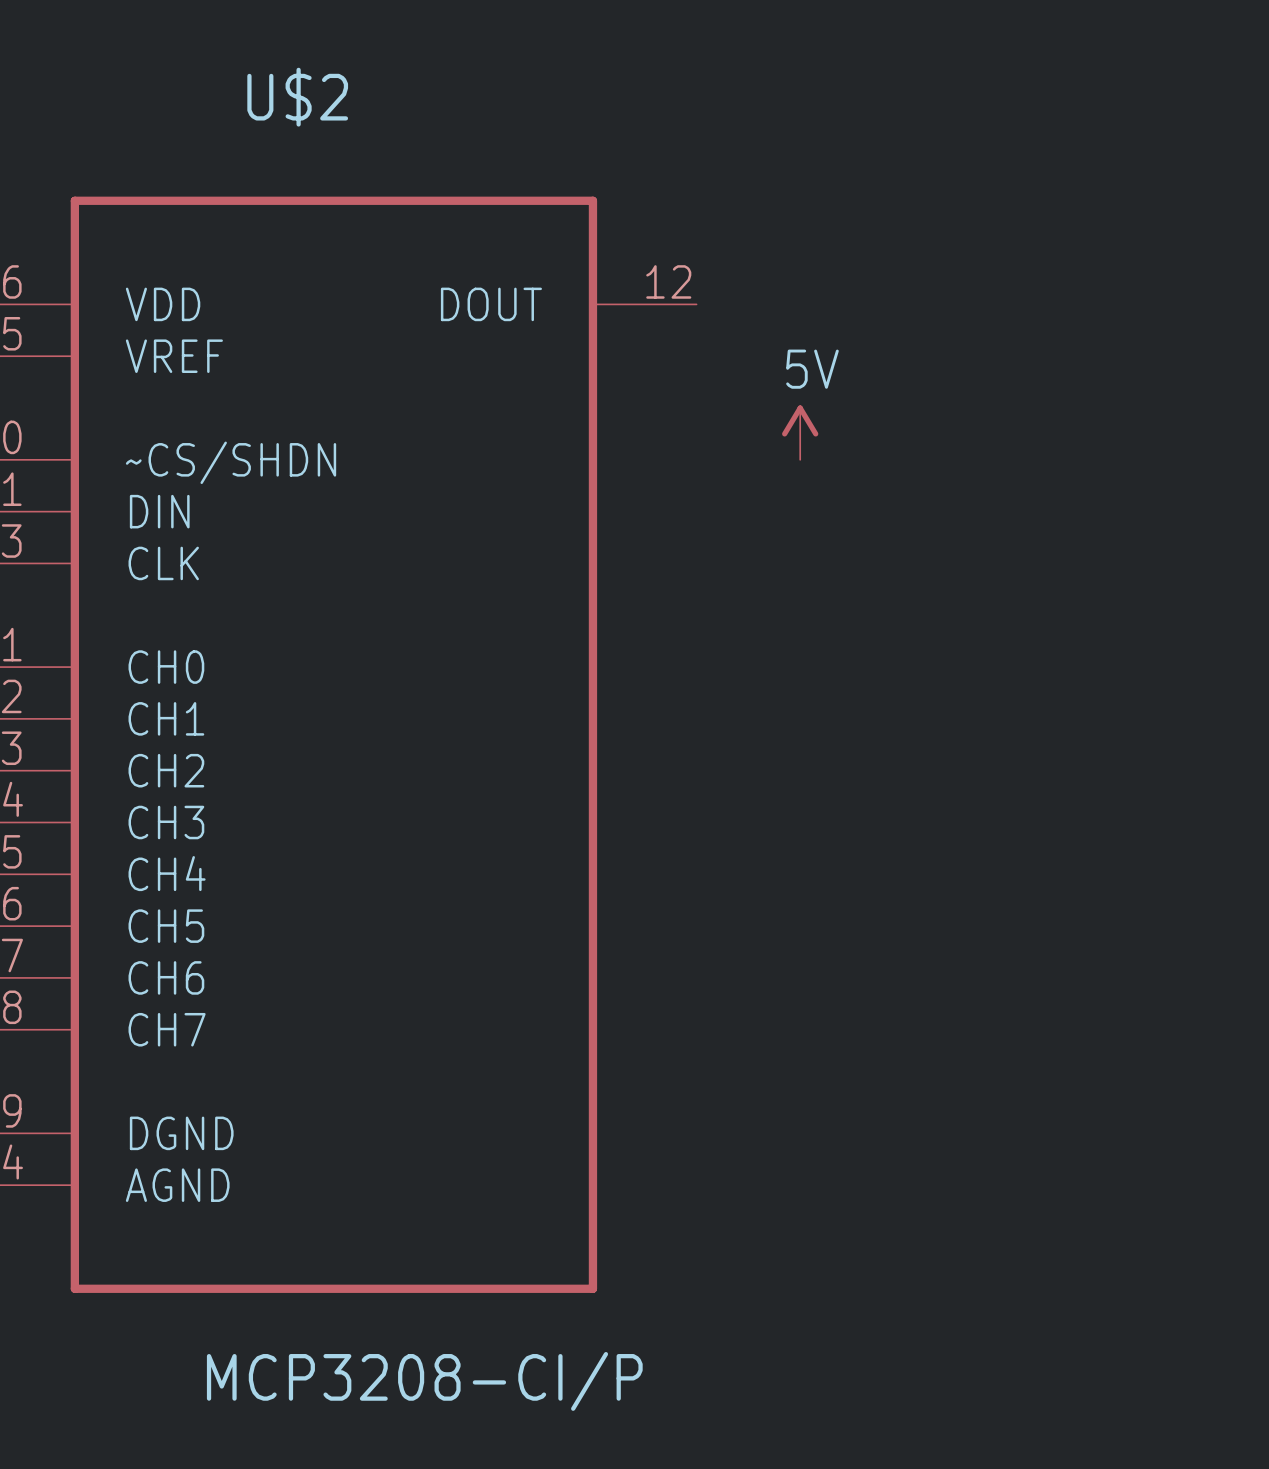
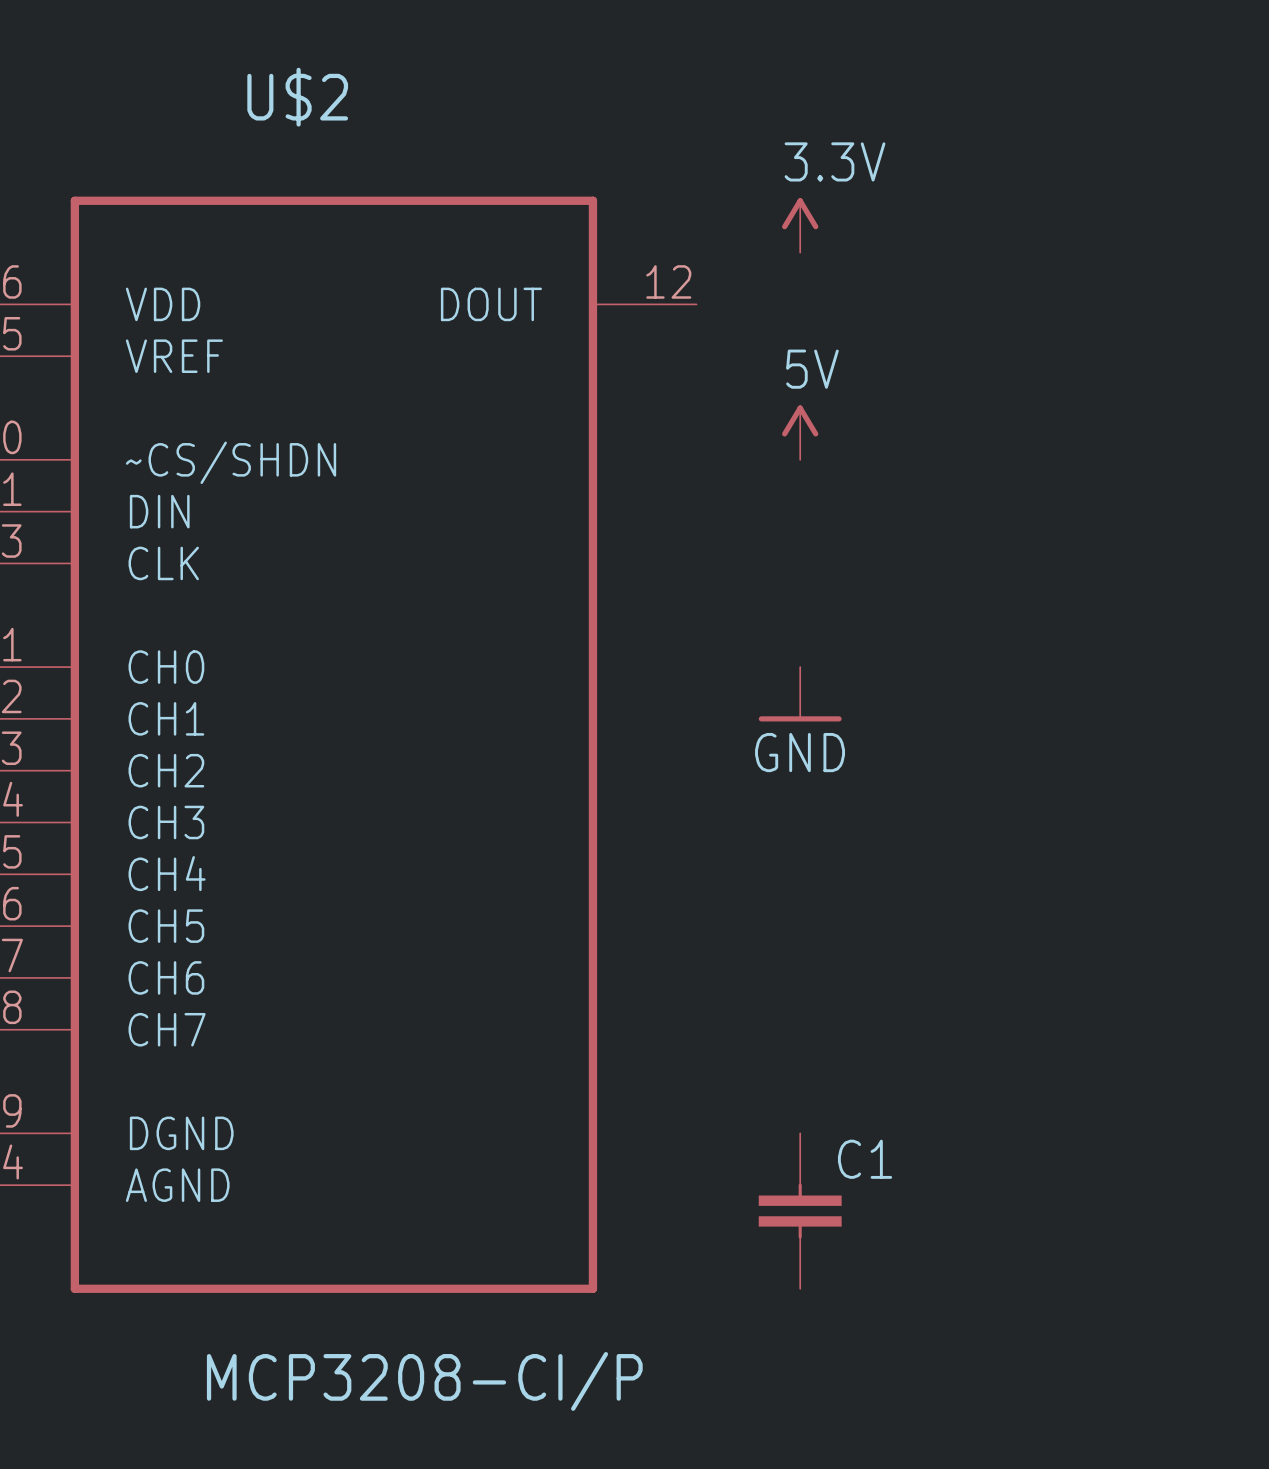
power symbol: none -> 3.3V (800, 225)
power symbol: none -> GND (800, 694)
C1: none -> (800, 1211)

